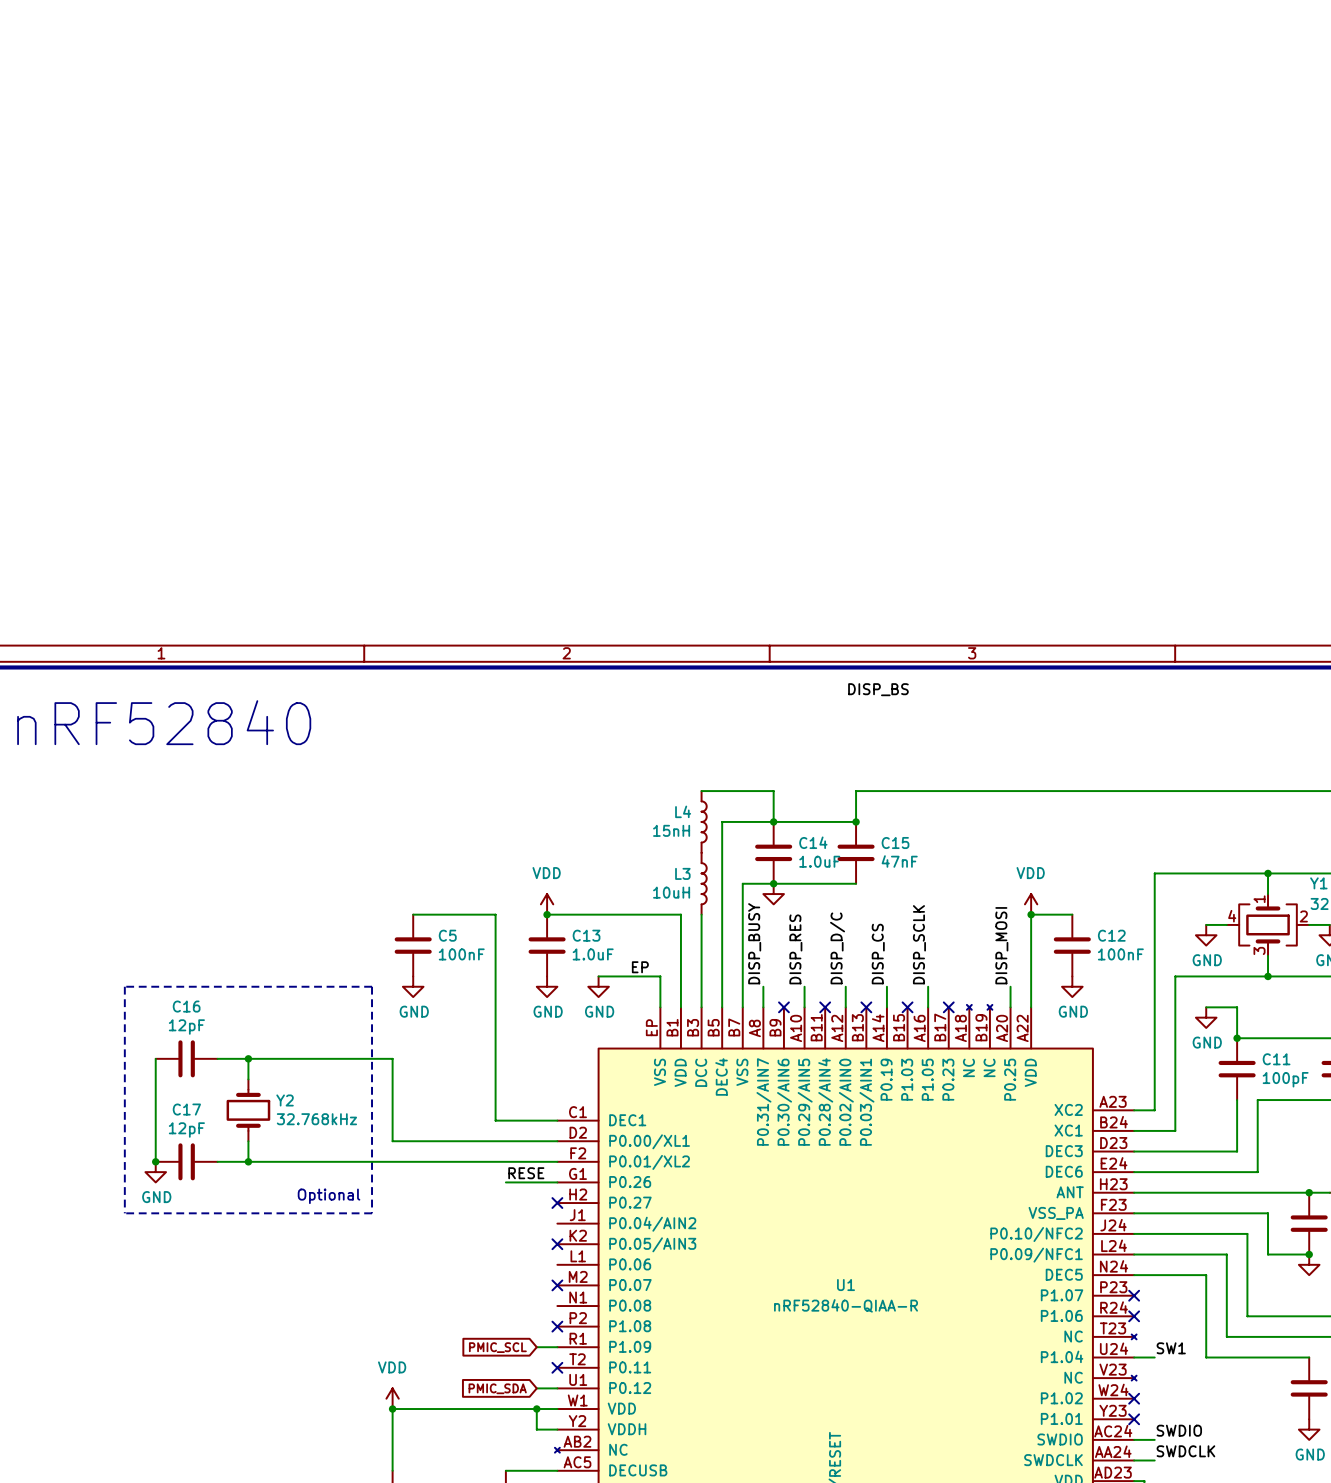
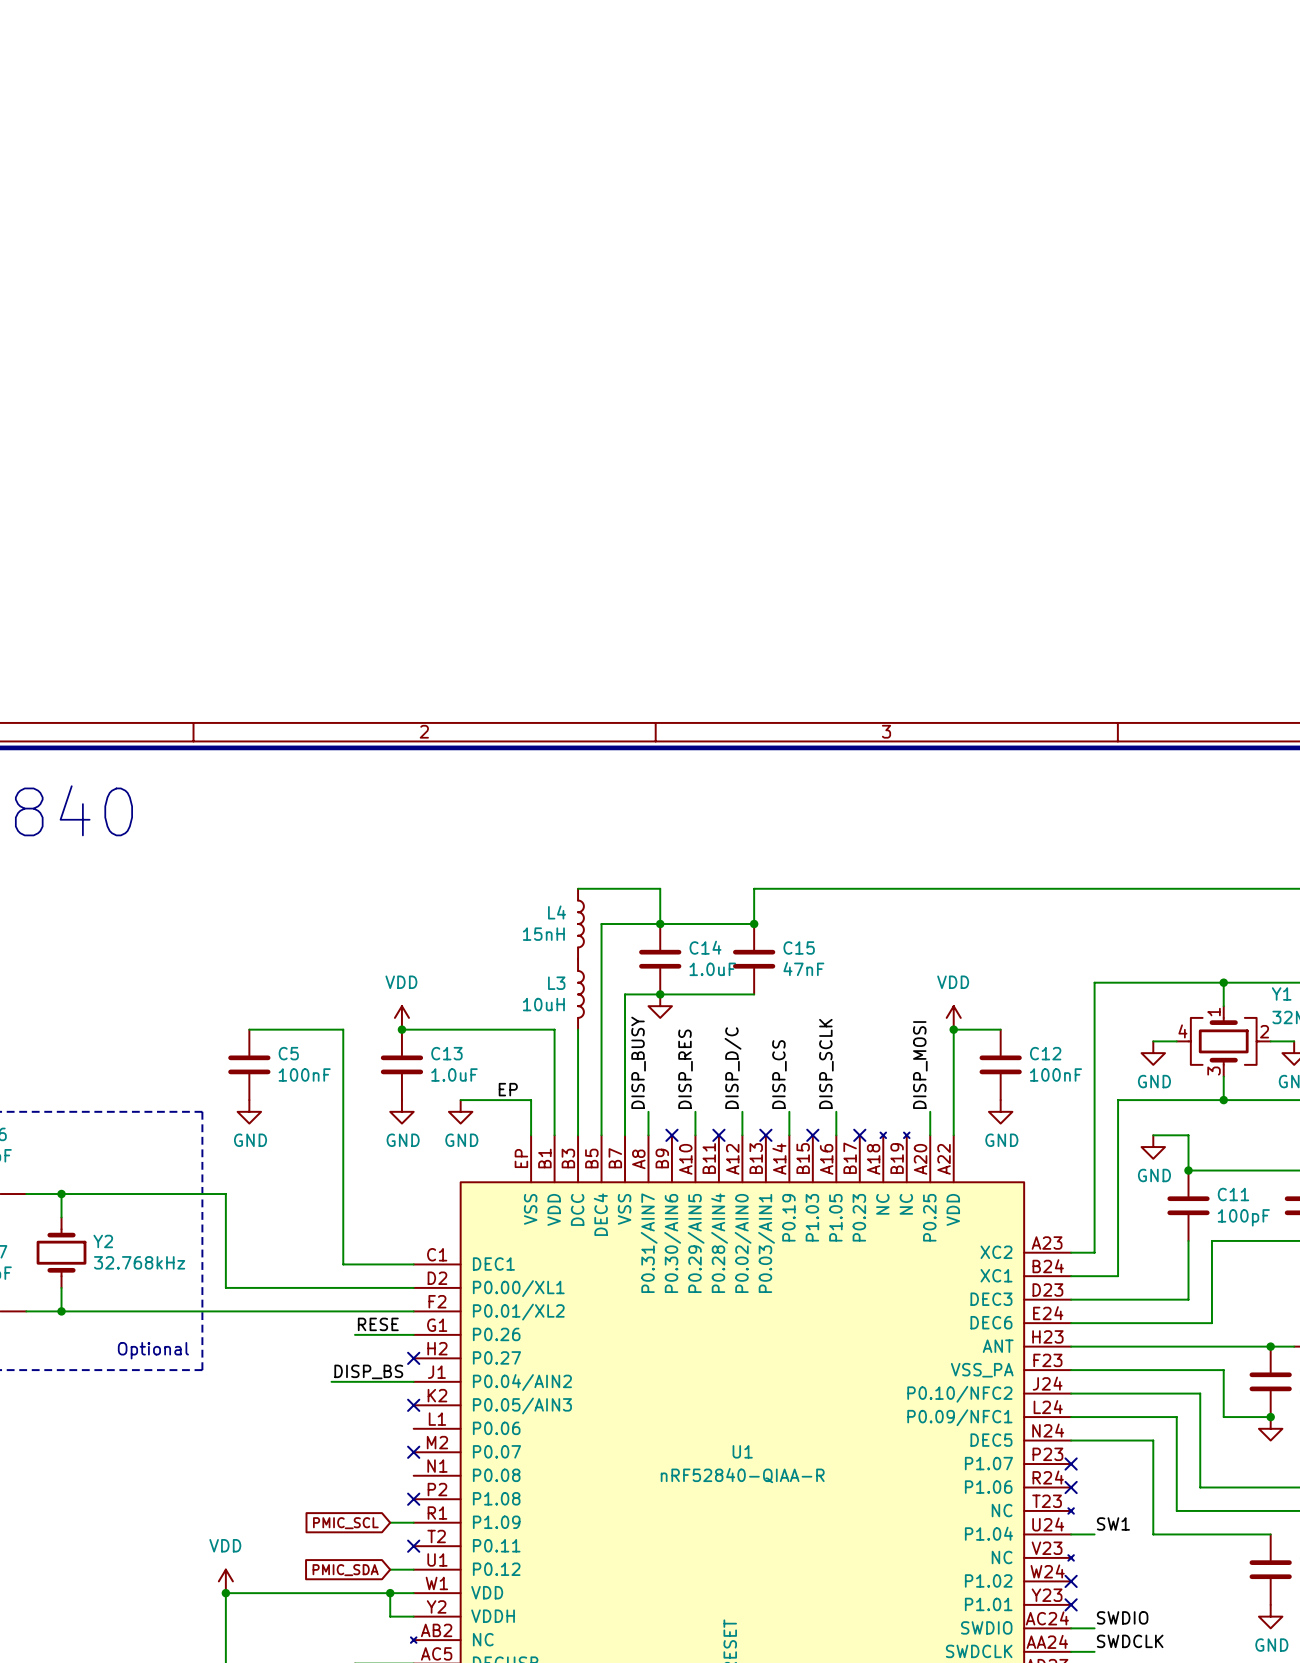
label: DISP_BS (878, 689) -> none
label: none -> DISP_BS (368, 1371)
wire: none -> (331, 1381) (413, 1381)

